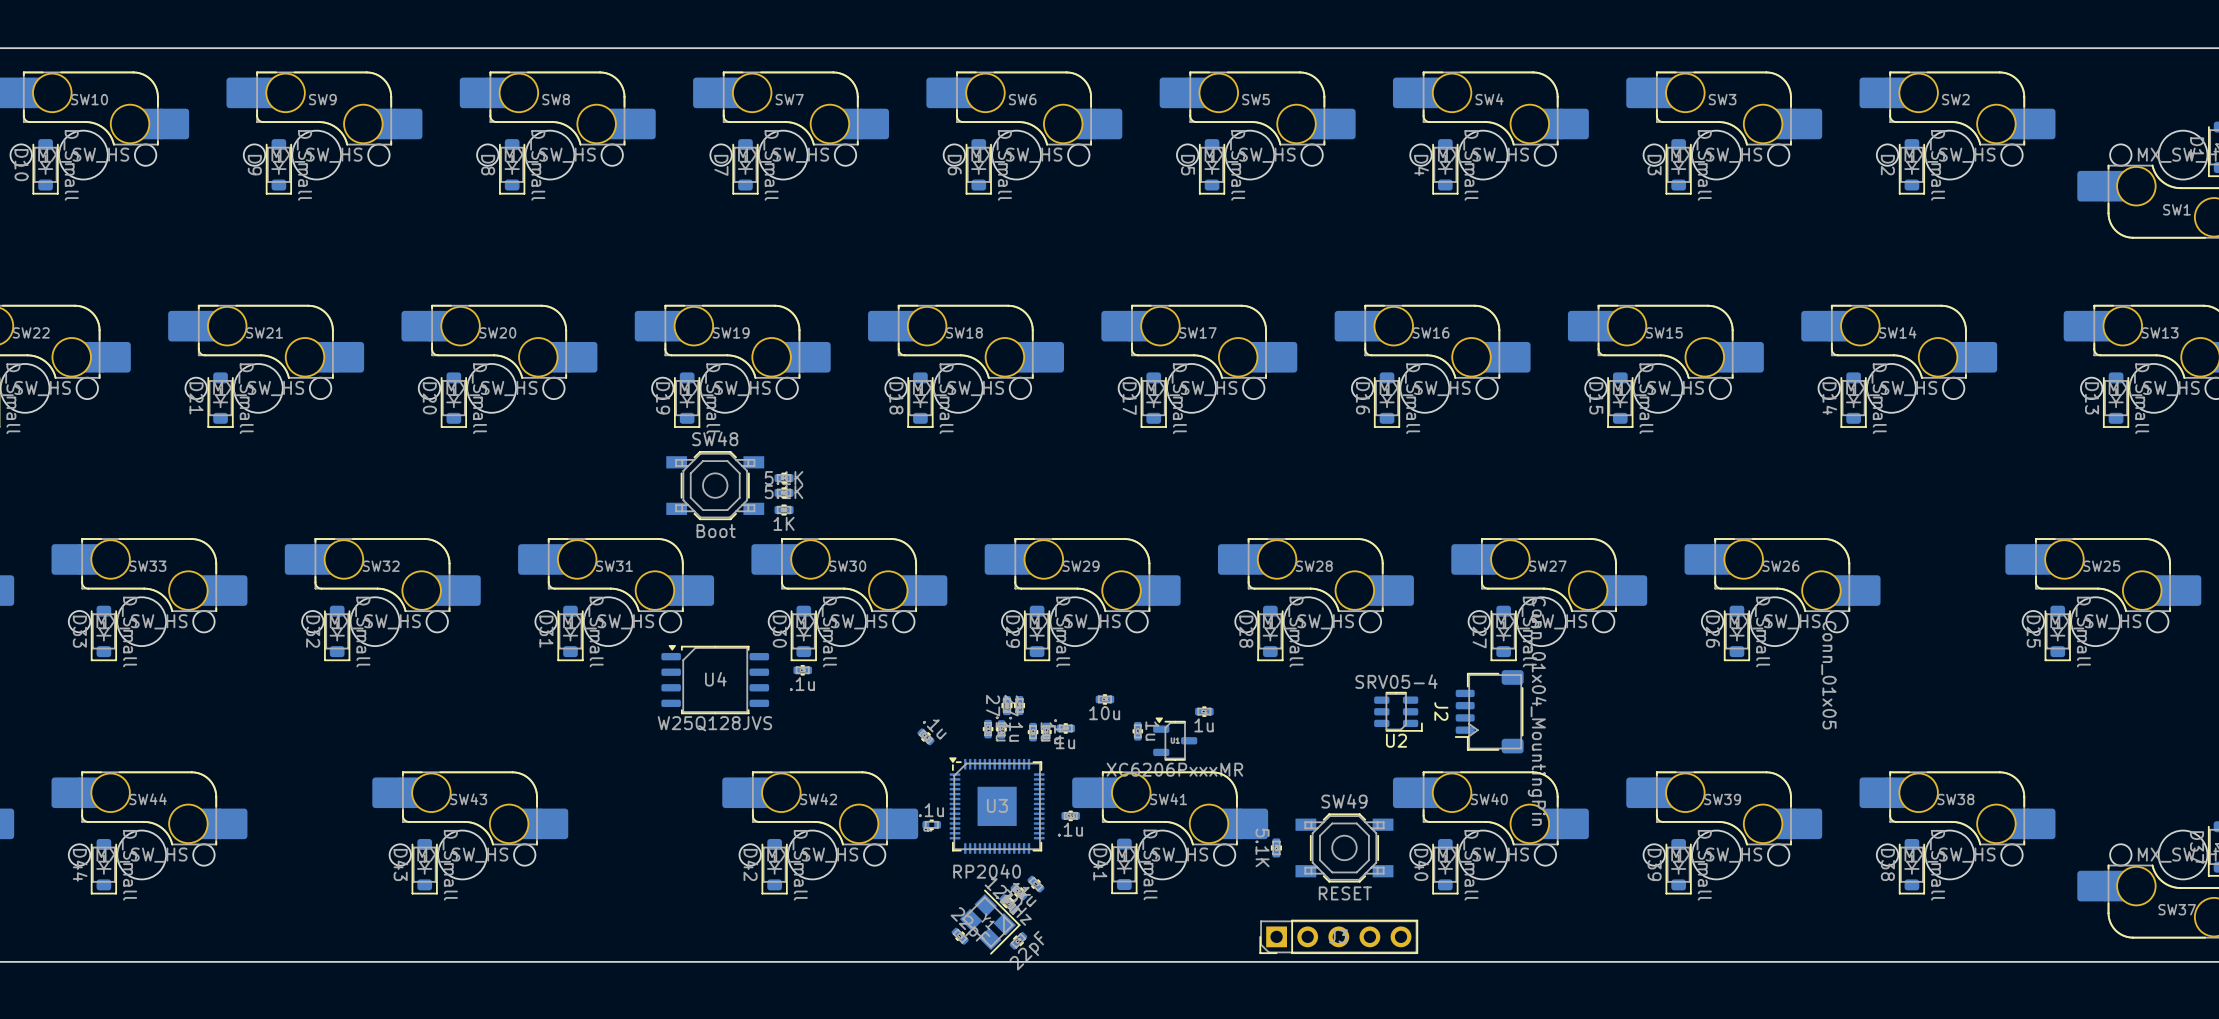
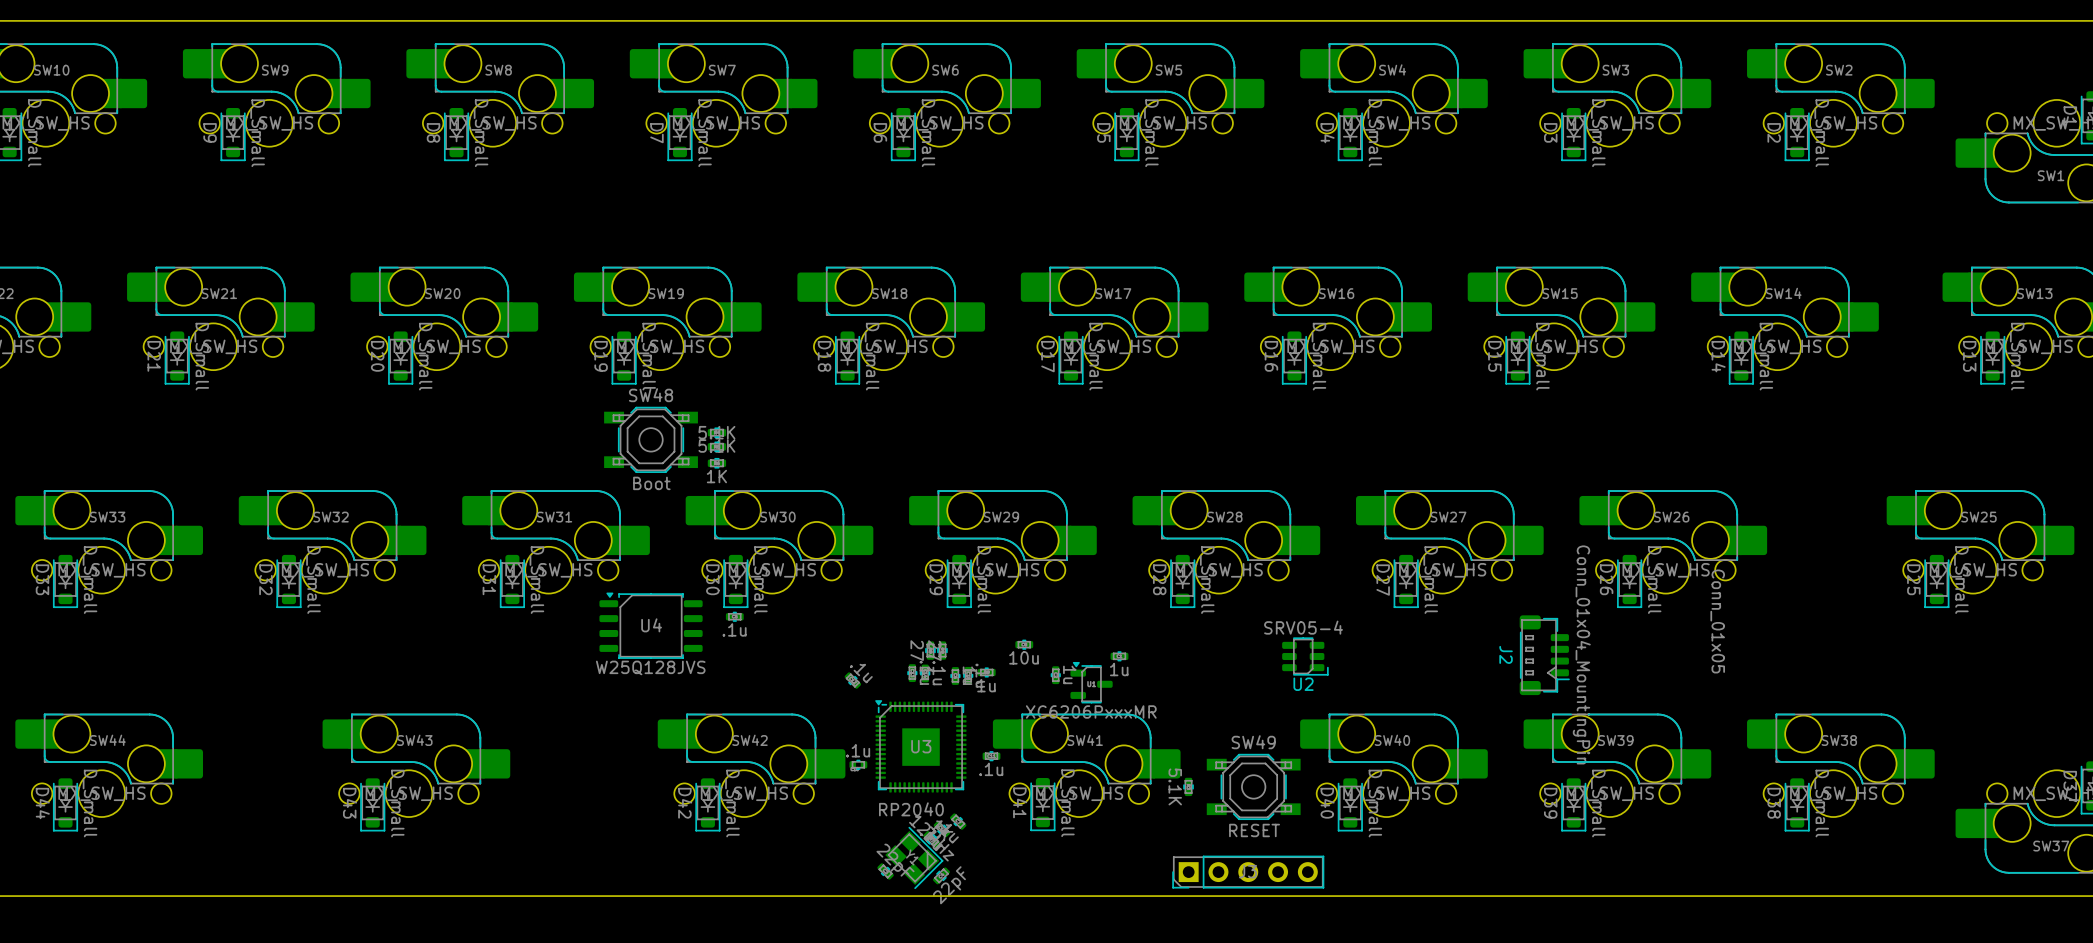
J2 footprint: [1454, 670, 1524, 754] -> [1519, 615, 1570, 696]

